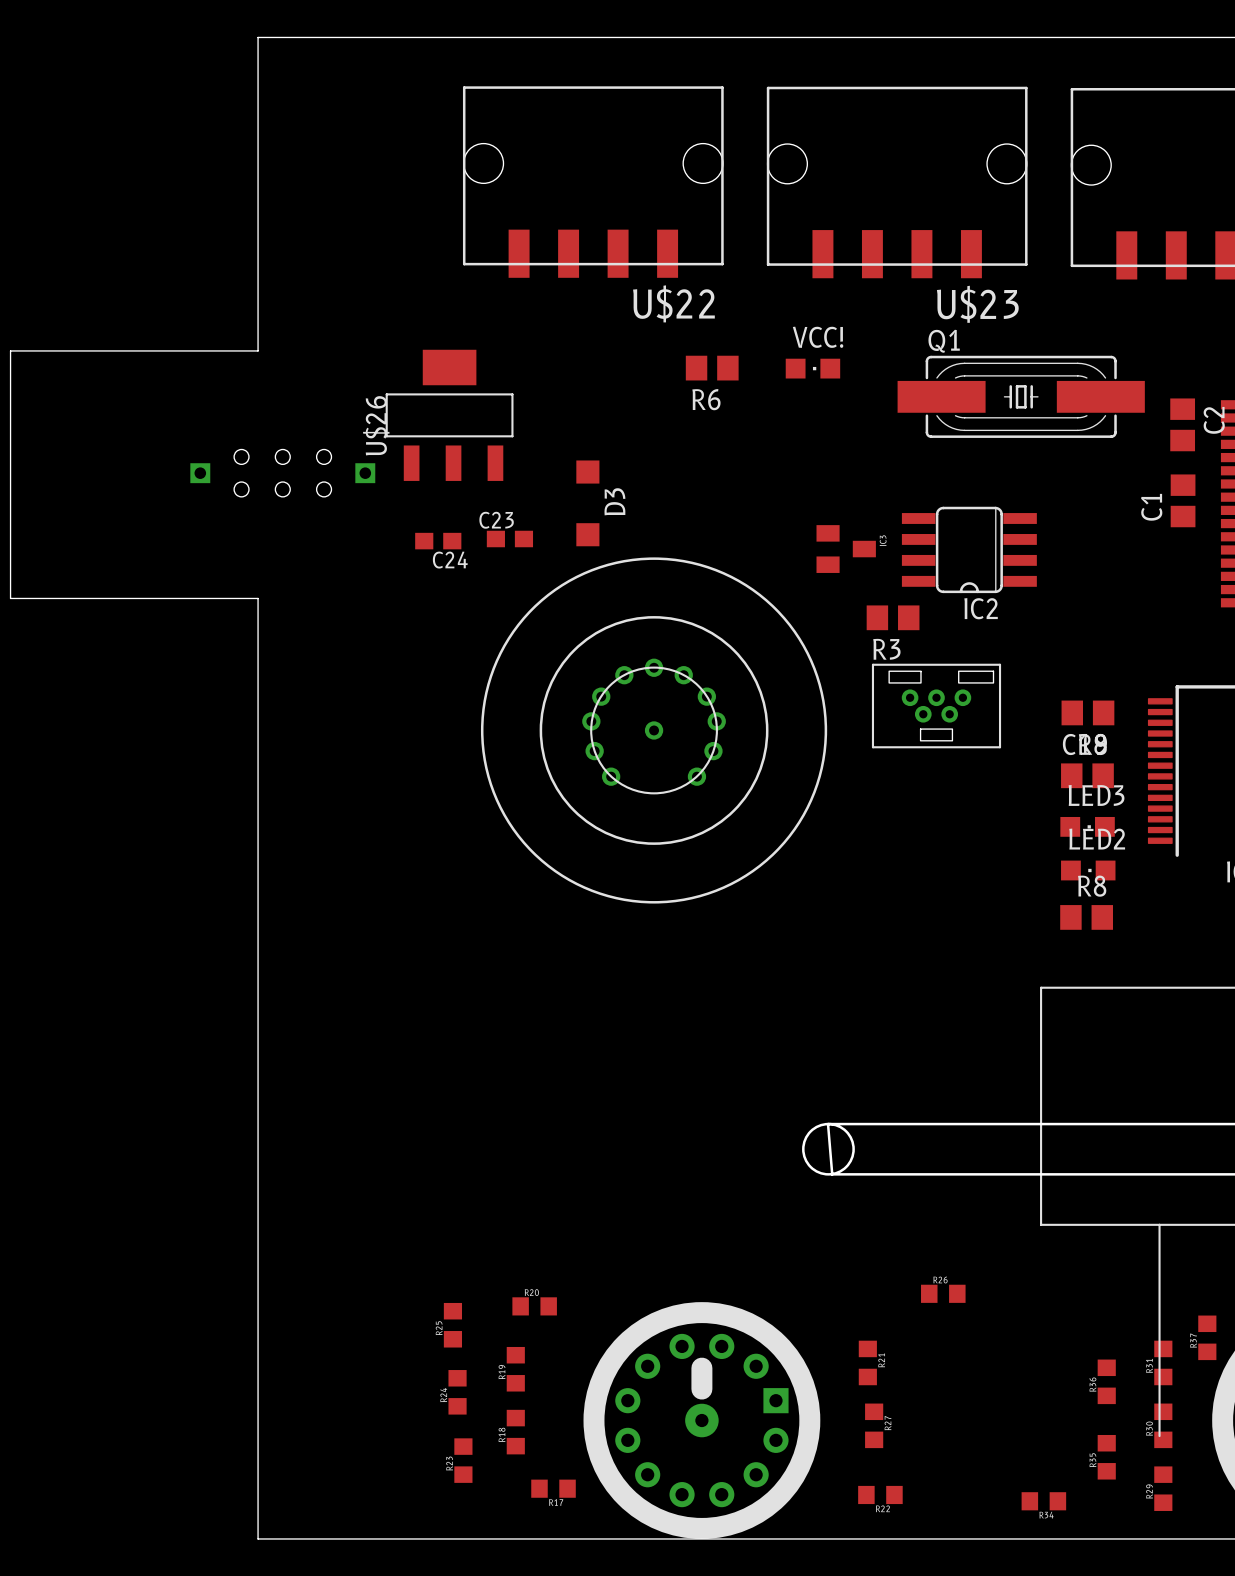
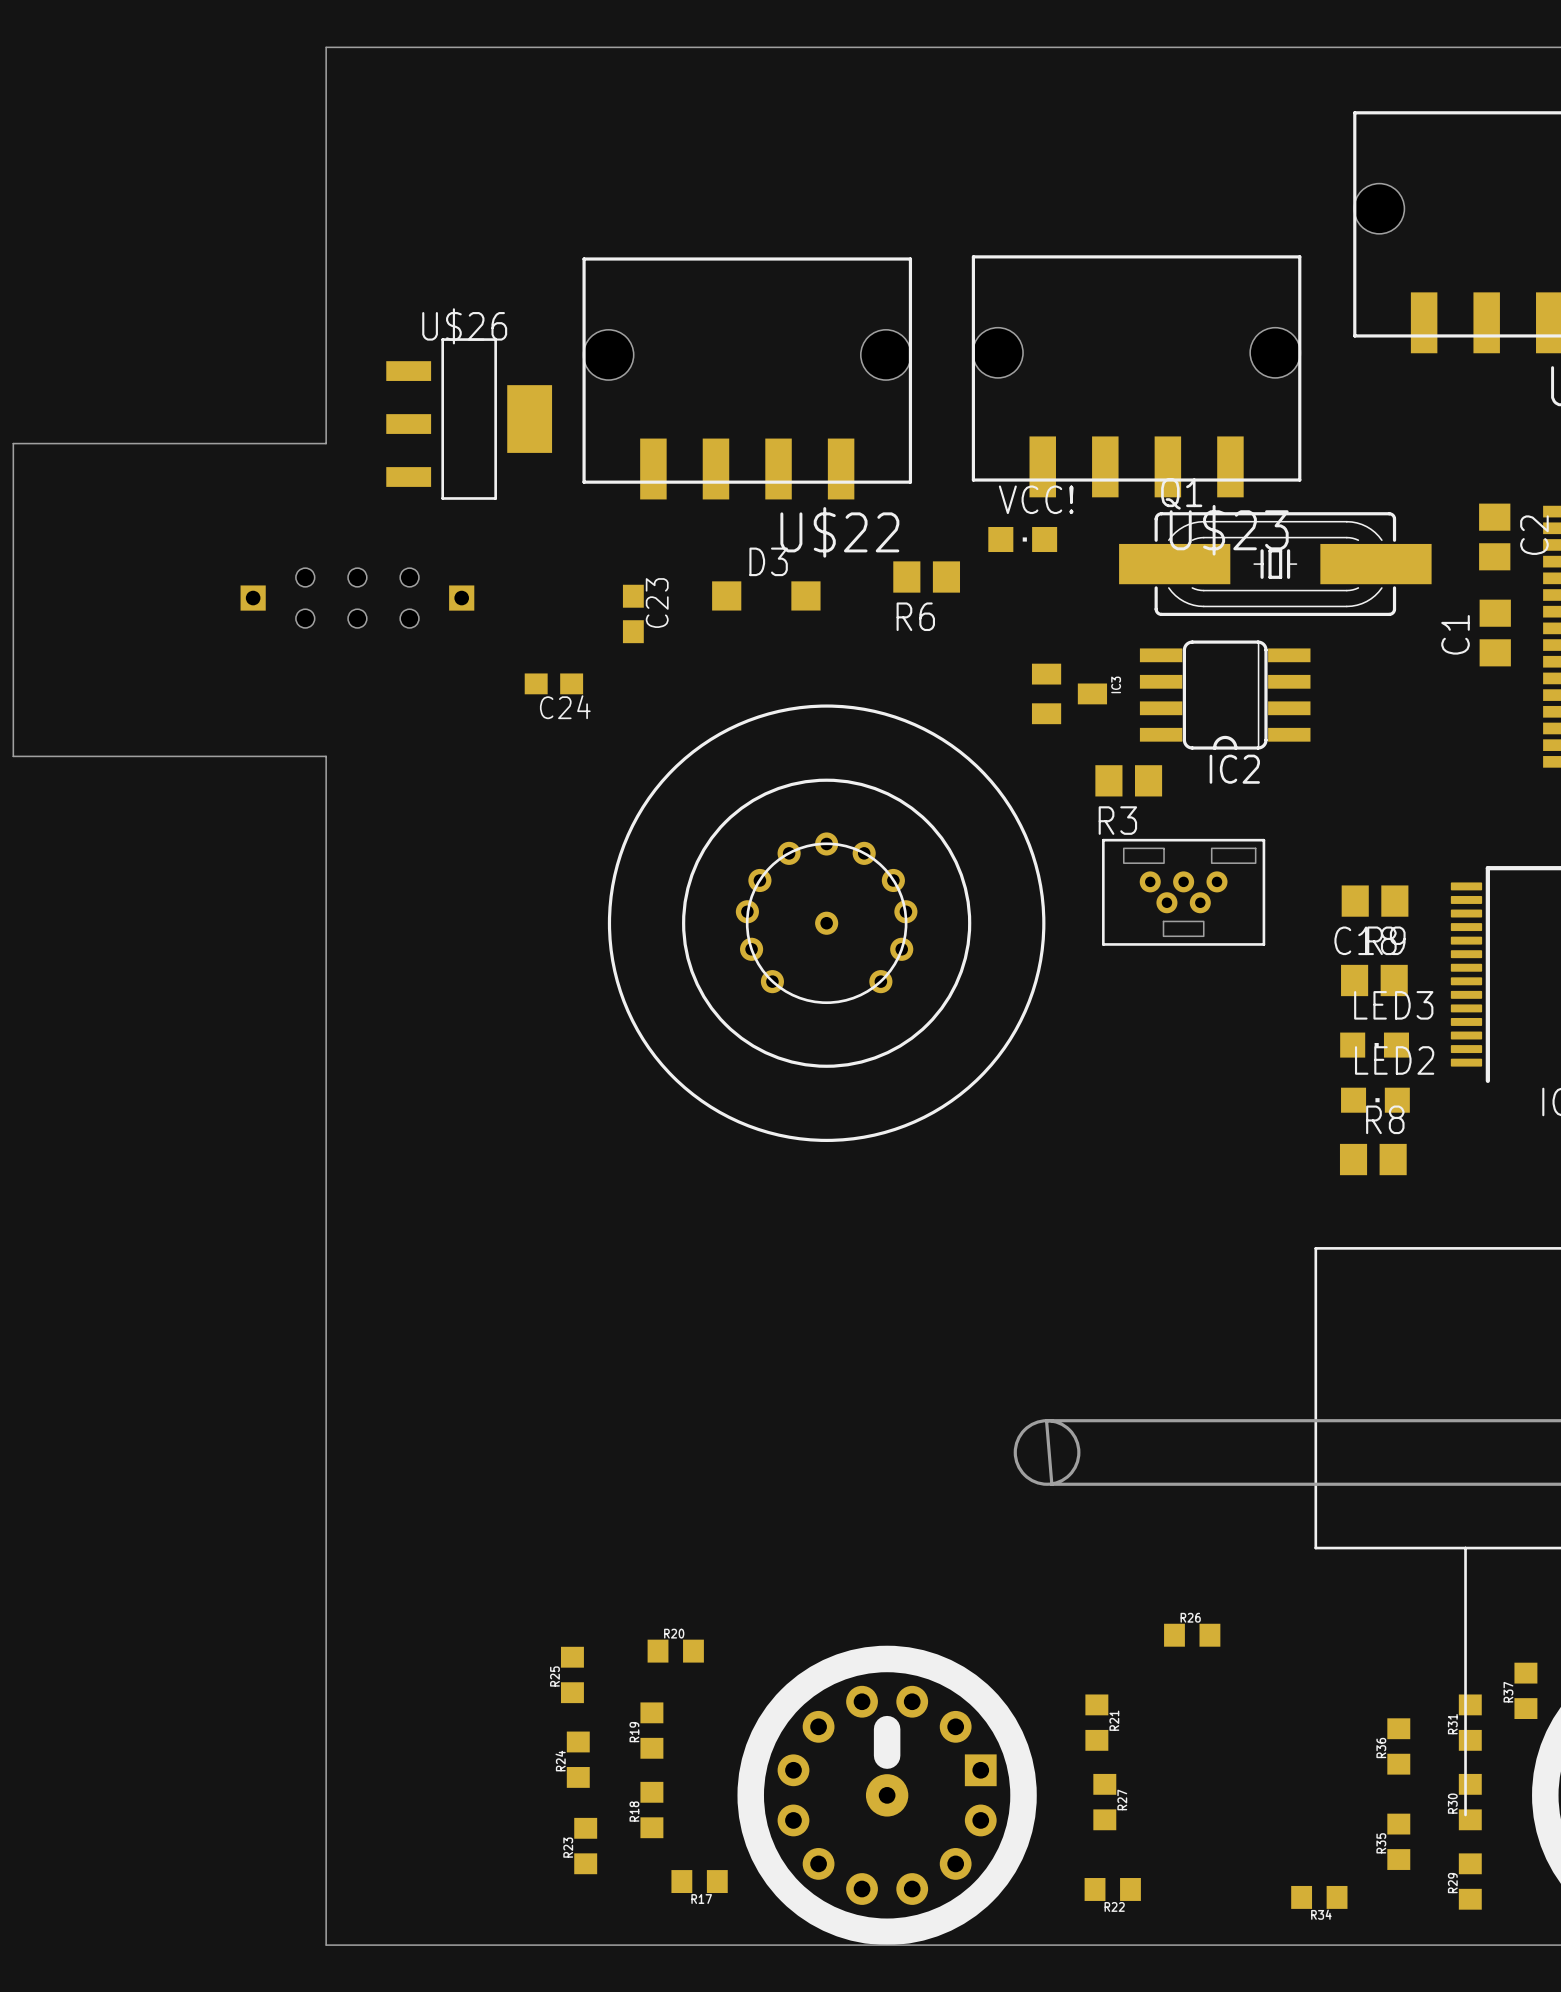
U$22 position: (593, 182) -> (747, 378)
U$23 position: (897, 182) -> (1136, 376)
R6 position: (712, 368) -> (926, 577)
VCC! position: (812, 368) -> (1022, 539)
Q1 position: (1021, 396) -> (1275, 564)
U$26 rotation: 0° (449, 415) -> 90° clockwise (469, 419)
U$26 position: (449, 415) -> (469, 419)
D3 name position: D3 (614, 501) -> D3 (768, 561)
D3 rotation: 0° (587, 503) -> 90° clockwise (766, 595)
C23 rotation: 0° (509, 538) -> 90° clockwise (633, 613)
C23 position: (509, 538) -> (633, 613)

